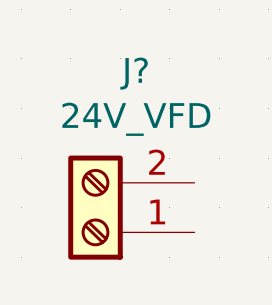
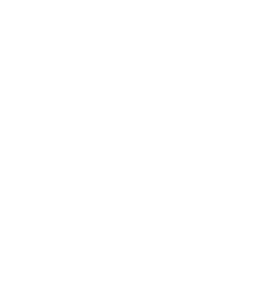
J?: 24V_VFD (131, 207) -> none

